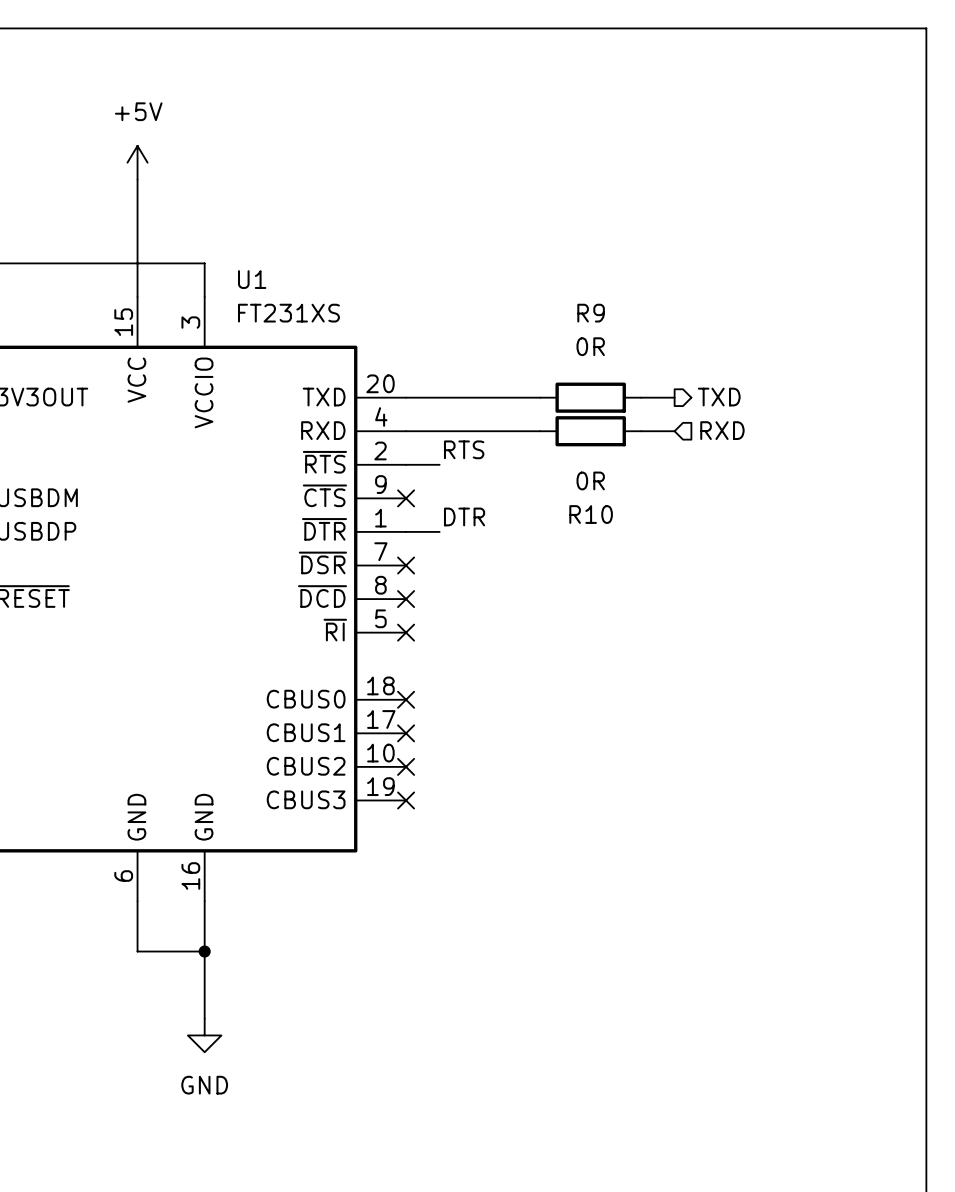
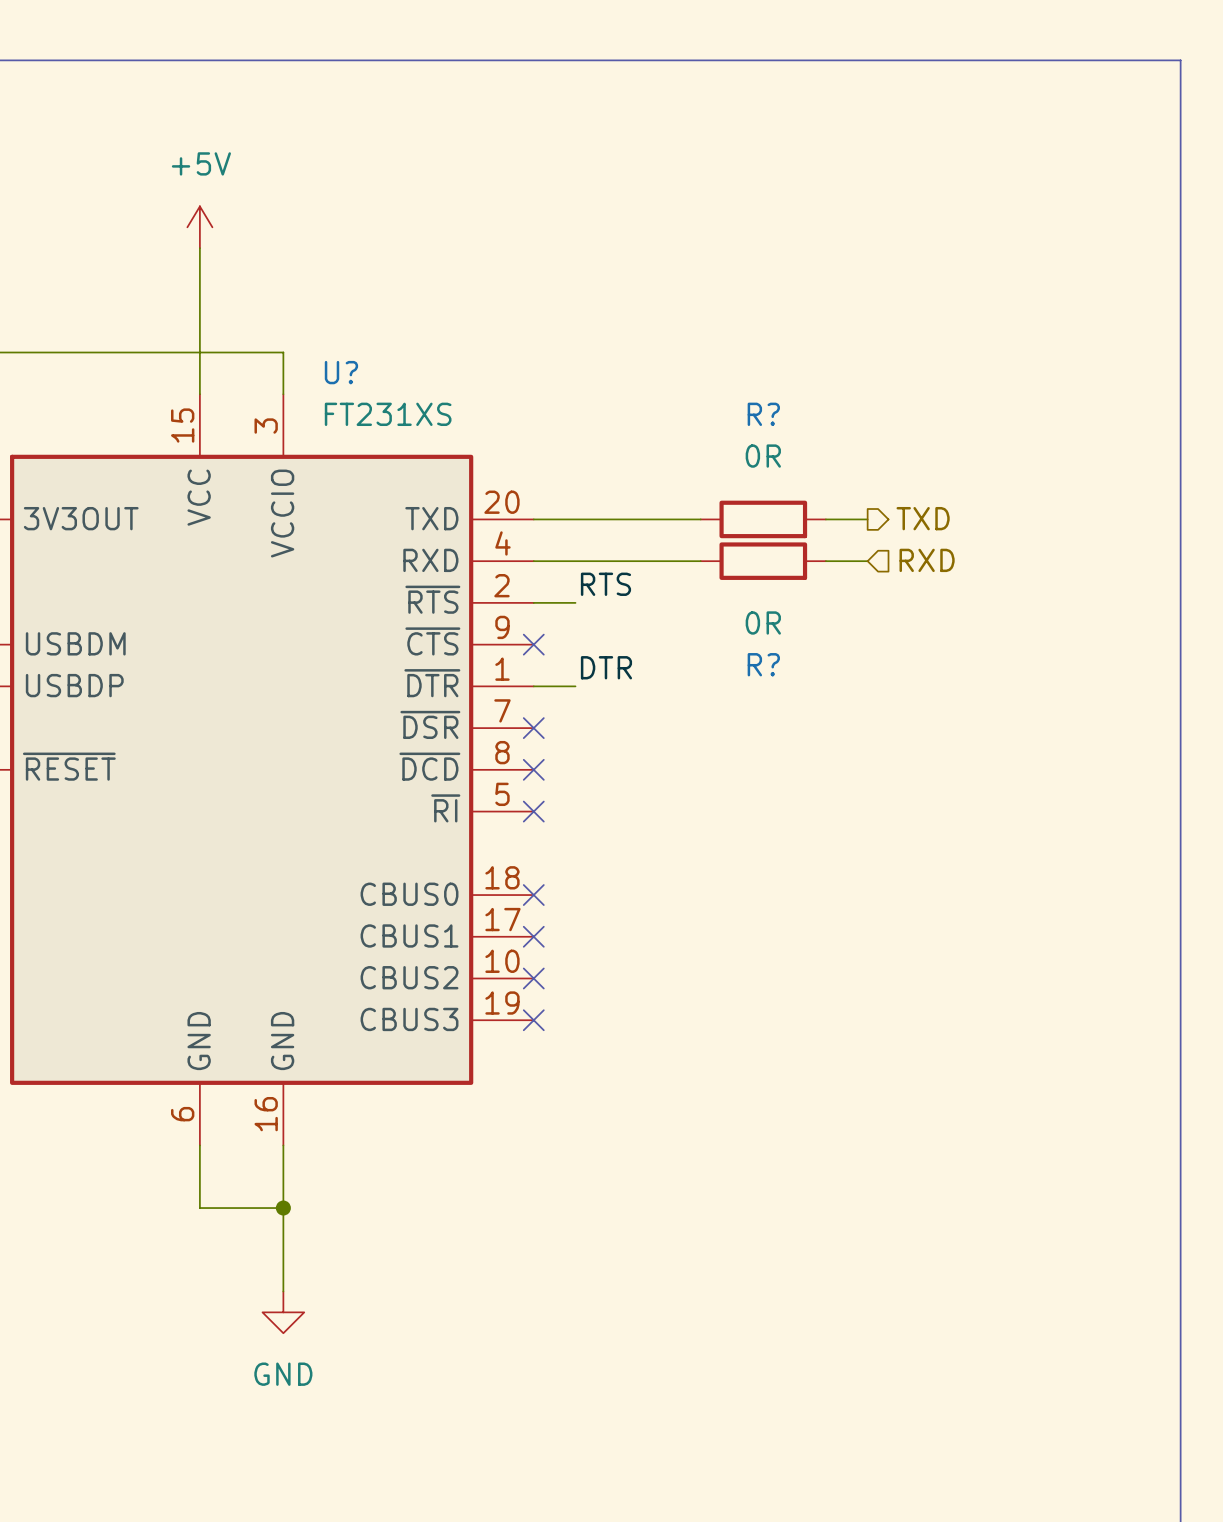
U1 name: U1 (252, 279) -> U? (341, 372)
R9 name: R9 (591, 313) -> R? (763, 414)
R10 name: R10 (591, 514) -> R? (763, 664)

